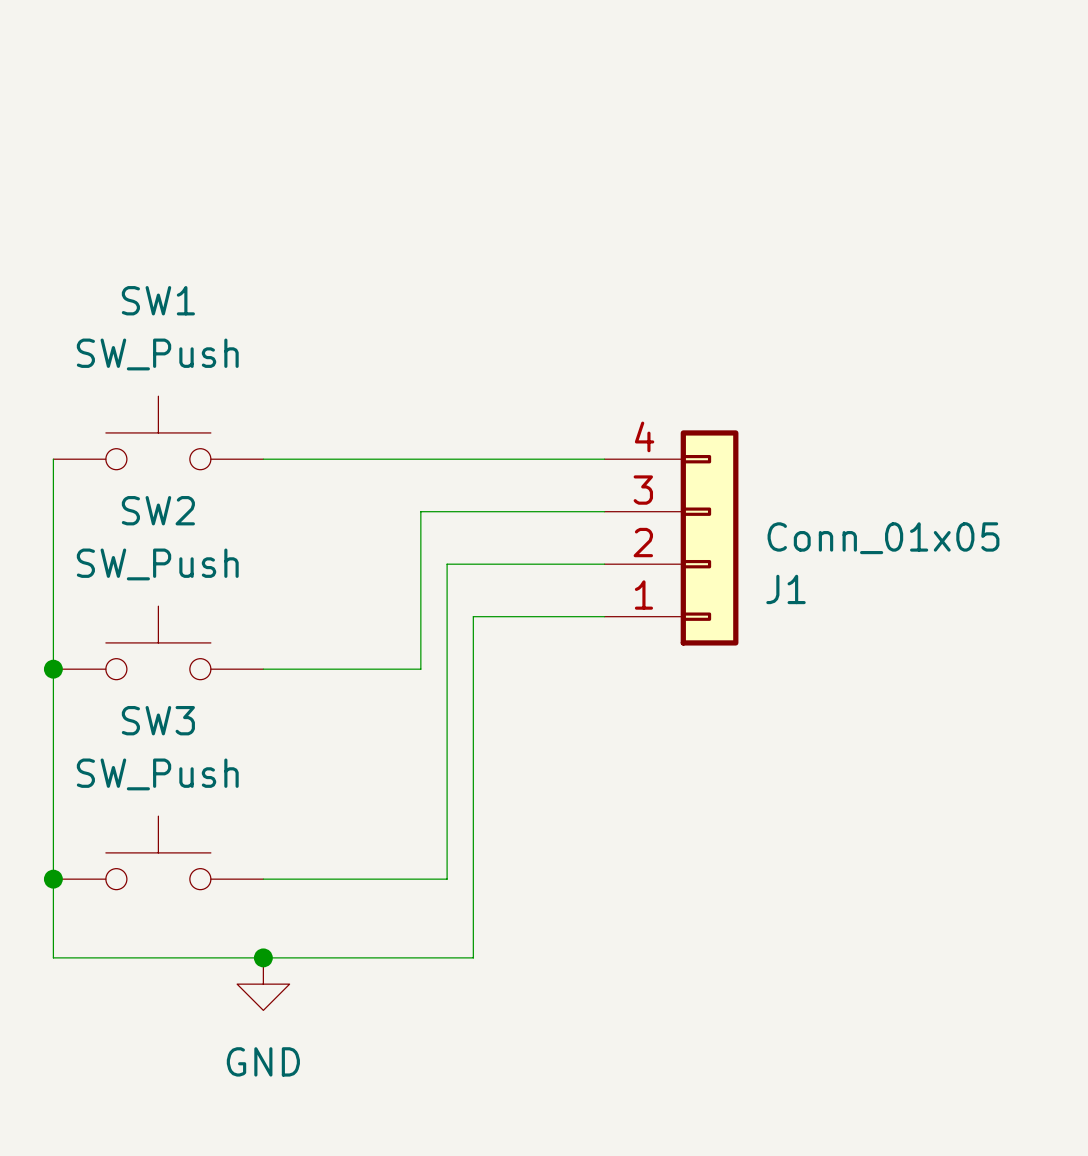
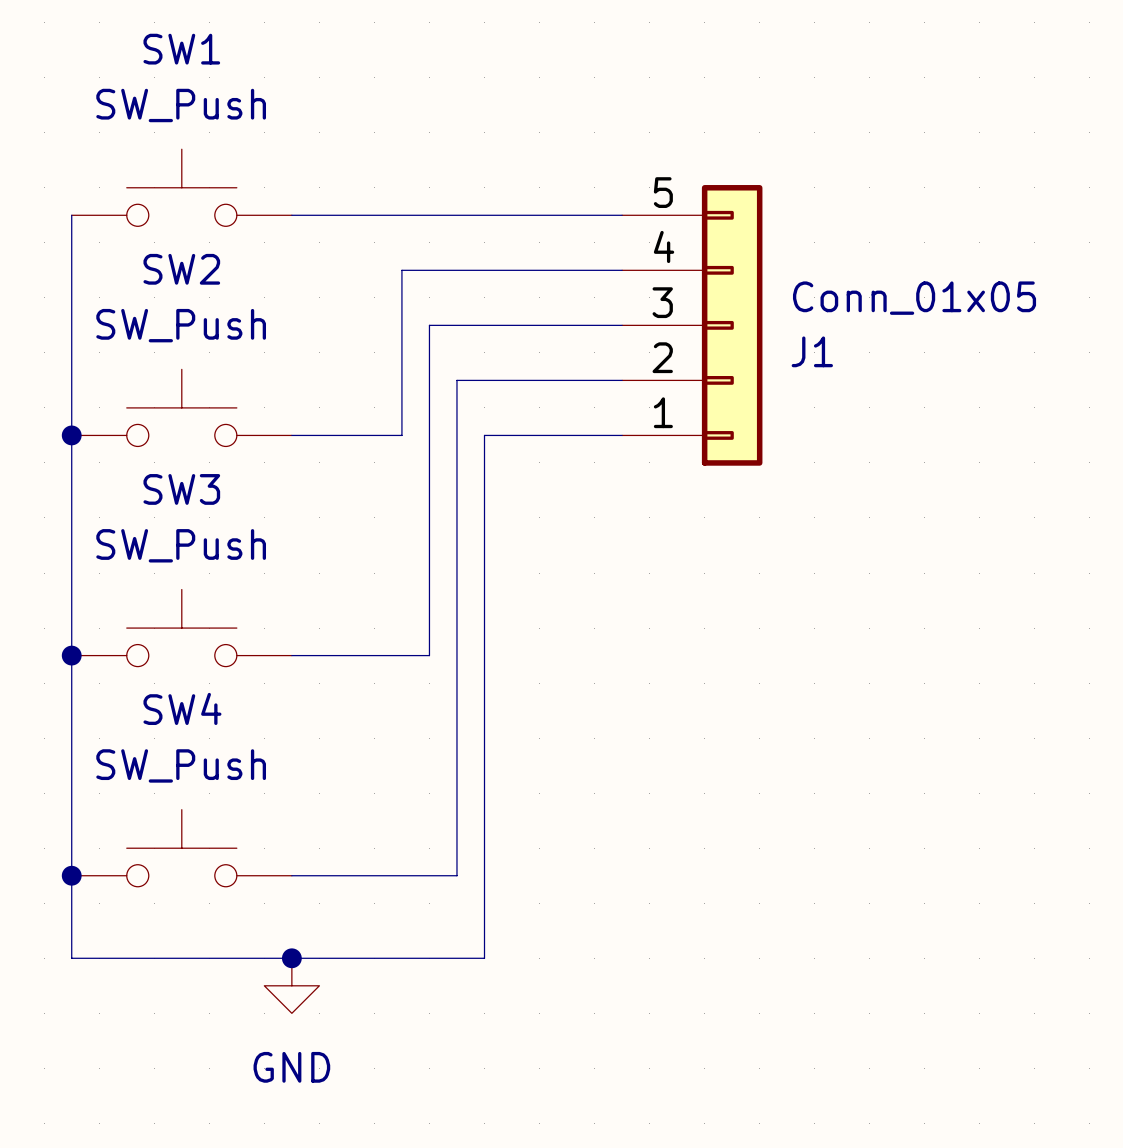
SW1: none -> SW_Push (181, 187)
wire: none -> (71, 215) (71, 435)
wire: none -> (291, 215) (622, 215)
SW1 name: SW1 (158, 300) -> SW2 (181, 269)
wire: none -> (622, 270) (401, 270) (401, 435)
wire: none -> (622, 325) (429, 325) (429, 655)
J1 symbol: [604, 430, 739, 646] -> [622, 185, 763, 466]
junction: none -> (71, 435)
wire: (368, 459) (447, 459) -> (484, 545) (484, 435)
SW2 name: SW2 (158, 510) -> SW3 (181, 489)
wire: (420, 511) (604, 511) -> (456, 490) (456, 380) (622, 380)
wire: (447, 564) (604, 564) -> none
wire: (604, 616) (473, 616) (473, 957) (447, 957) -> none
wire: (394, 669) (420, 669) -> (456, 875) (456, 655)
SW3 name: SW3 (158, 720) -> SW4 (182, 708)
wire: (420, 879) (447, 879) -> (484, 958) (484, 875)

